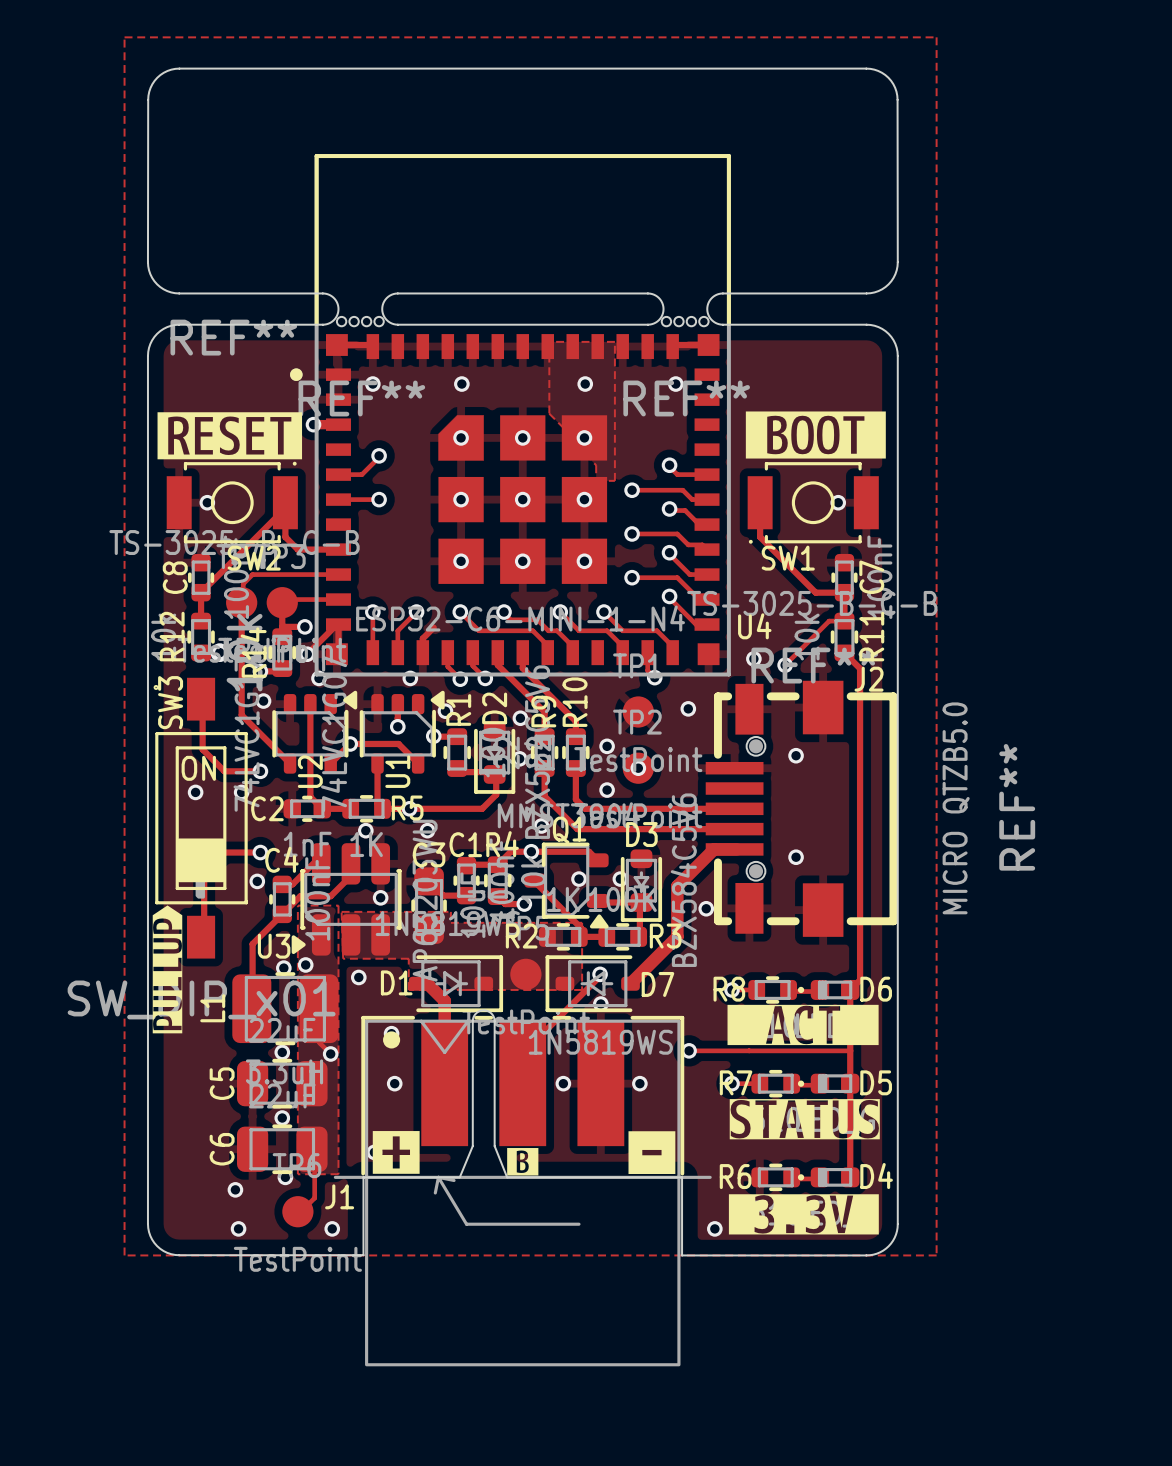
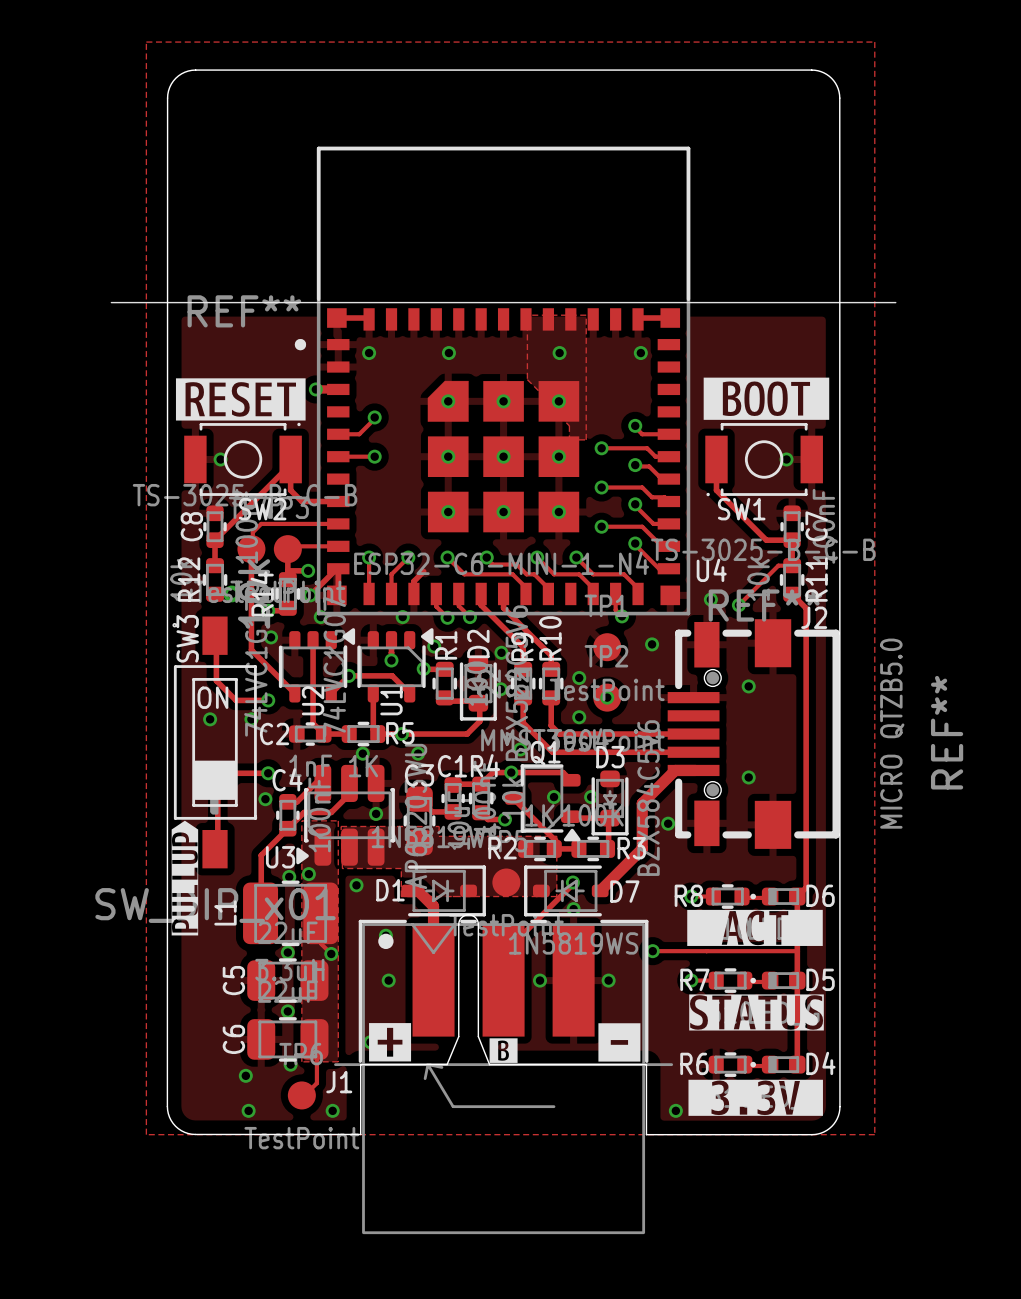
board edge: (866, 68) (878, 70) (885, 75) (893, 84) (897, 95) (897, 262) (893, 277) (882, 289) (870, 293) (720, 293) (711, 298) (707, 309) (711, 319) (720, 324) (874, 325) (888, 333) (896, 347) (897, 1223) -> (811, 70) (821, 71) (831, 78) (838, 88) (839, 98) (839, 1106)
board edge: (148, 99) (147, 262) (150, 274) (157, 284) (167, 291) (179, 293) (324, 293) (334, 298) (338, 309) (334, 319) (324, 324) (171, 325) (157, 333) (149, 347) (147, 1223) -> (167, 98) (167, 1106)
board edge: (397, 293) (647, 293) (658, 298) (663, 309) (658, 320) (647, 324) (397, 324) (386, 320) (382, 309) (386, 298) (397, 293) -> none
REF**: (360, 321) -> none
REF**: (685, 321) -> none
line: none -> (111, 302) (895, 302)

